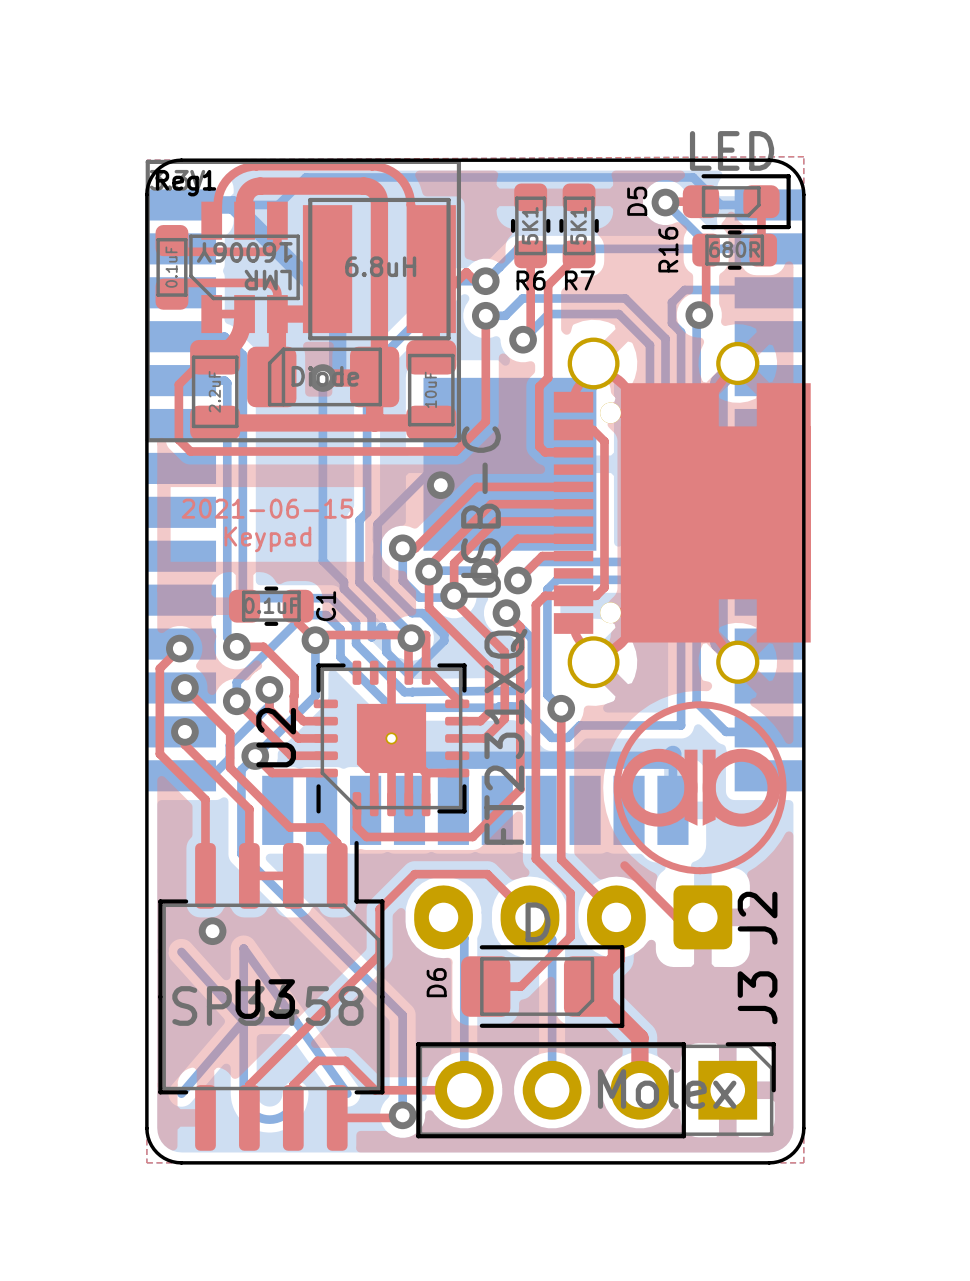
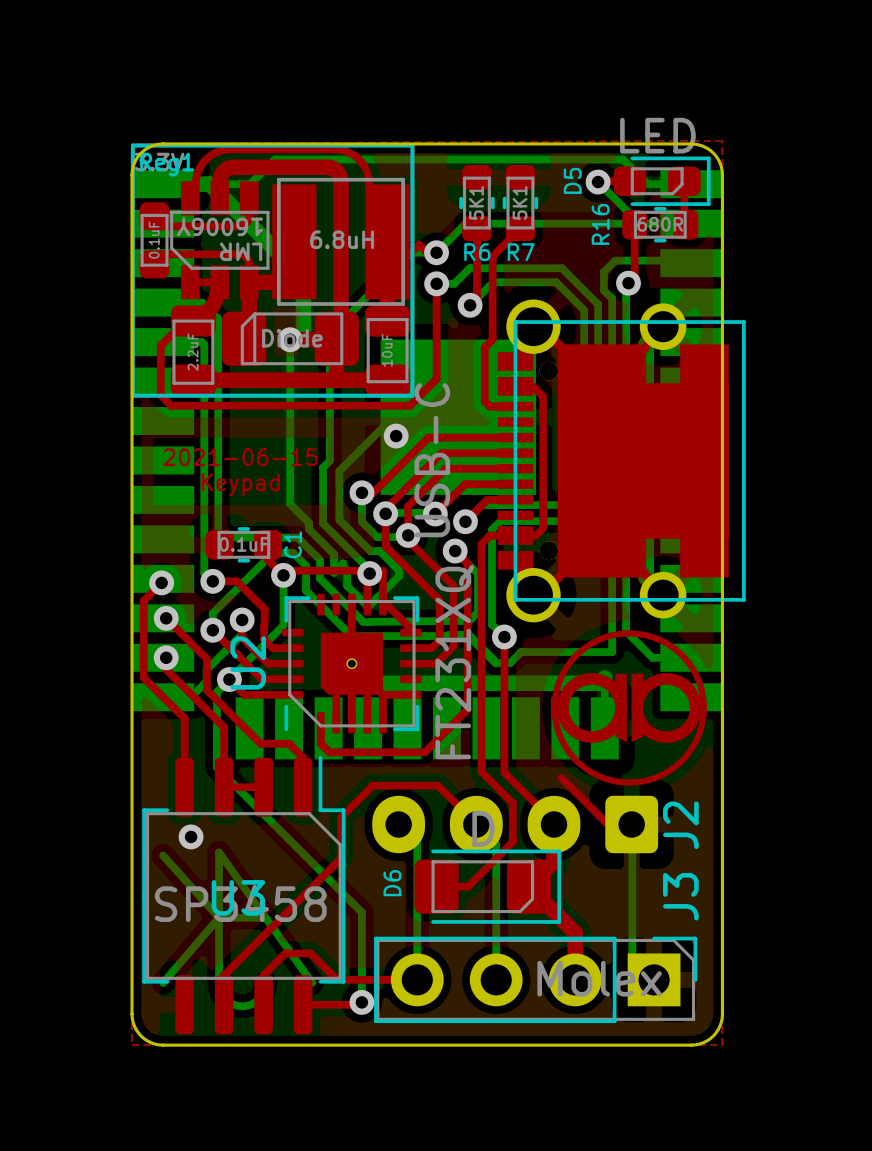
Reg1 footprint: [145, 159, 462, 443] -> [130, 143, 415, 398]
J2 footprint: [553, 337, 811, 689] -> [497, 299, 746, 623]
bottom track: none -> (632, 824) (632, 958)

